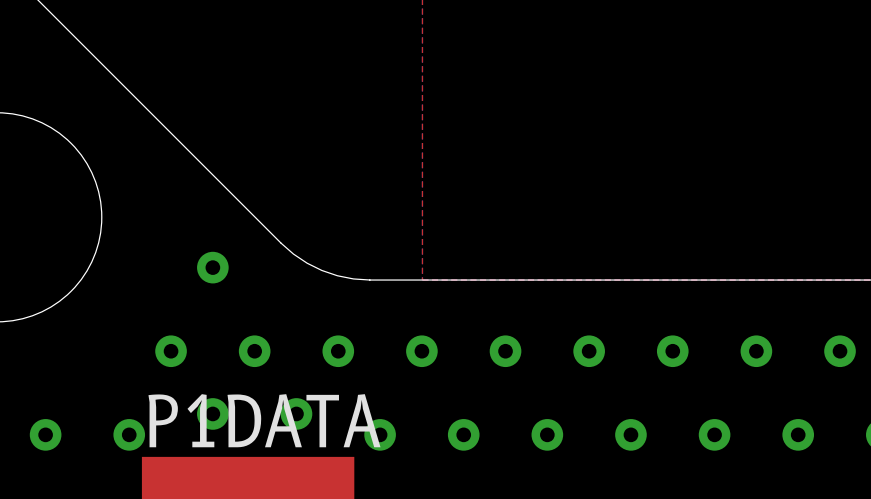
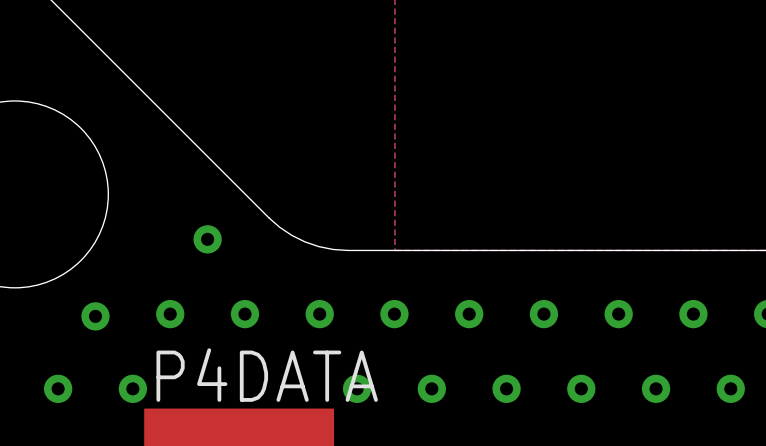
via: none -> (95, 316)
via: (212, 413) -> none
via: (296, 413) -> none
P1DATA name: P1DATA (264, 420) -> P4DATA (267, 375)

